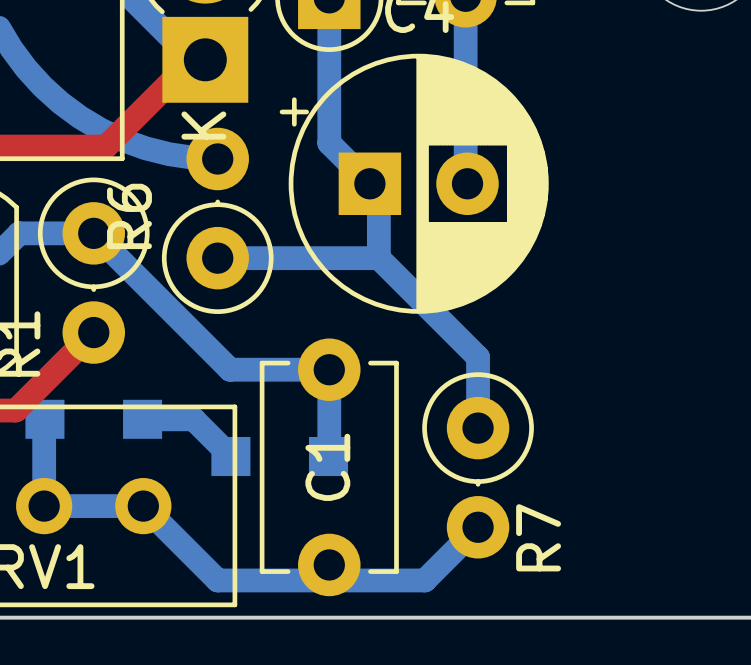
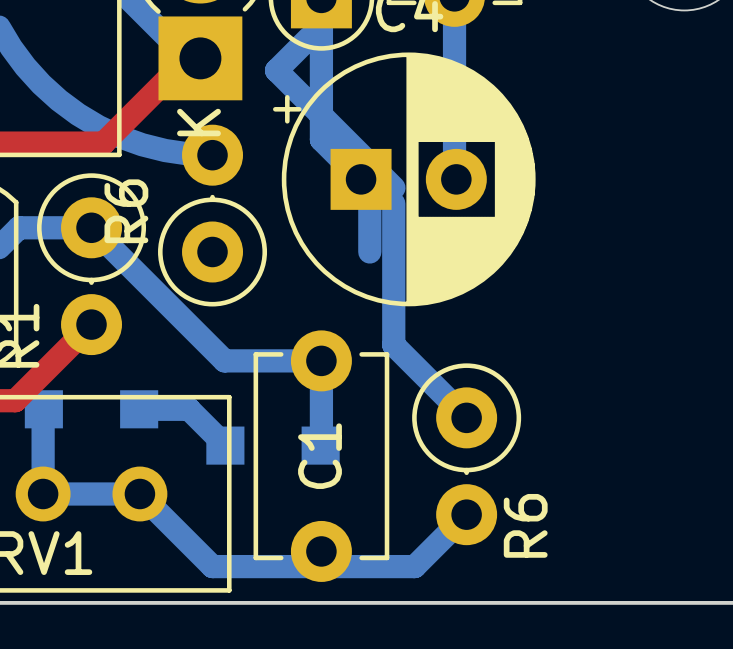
bottom track: none -> (309, 37) (276, 70) (393, 187)
bottom track: (217, 258) (378, 258) (478, 357) (478, 428) -> (393, 203) (393, 345) (466, 417)
R7 name: R7 (538, 537) -> R6 (525, 525)

